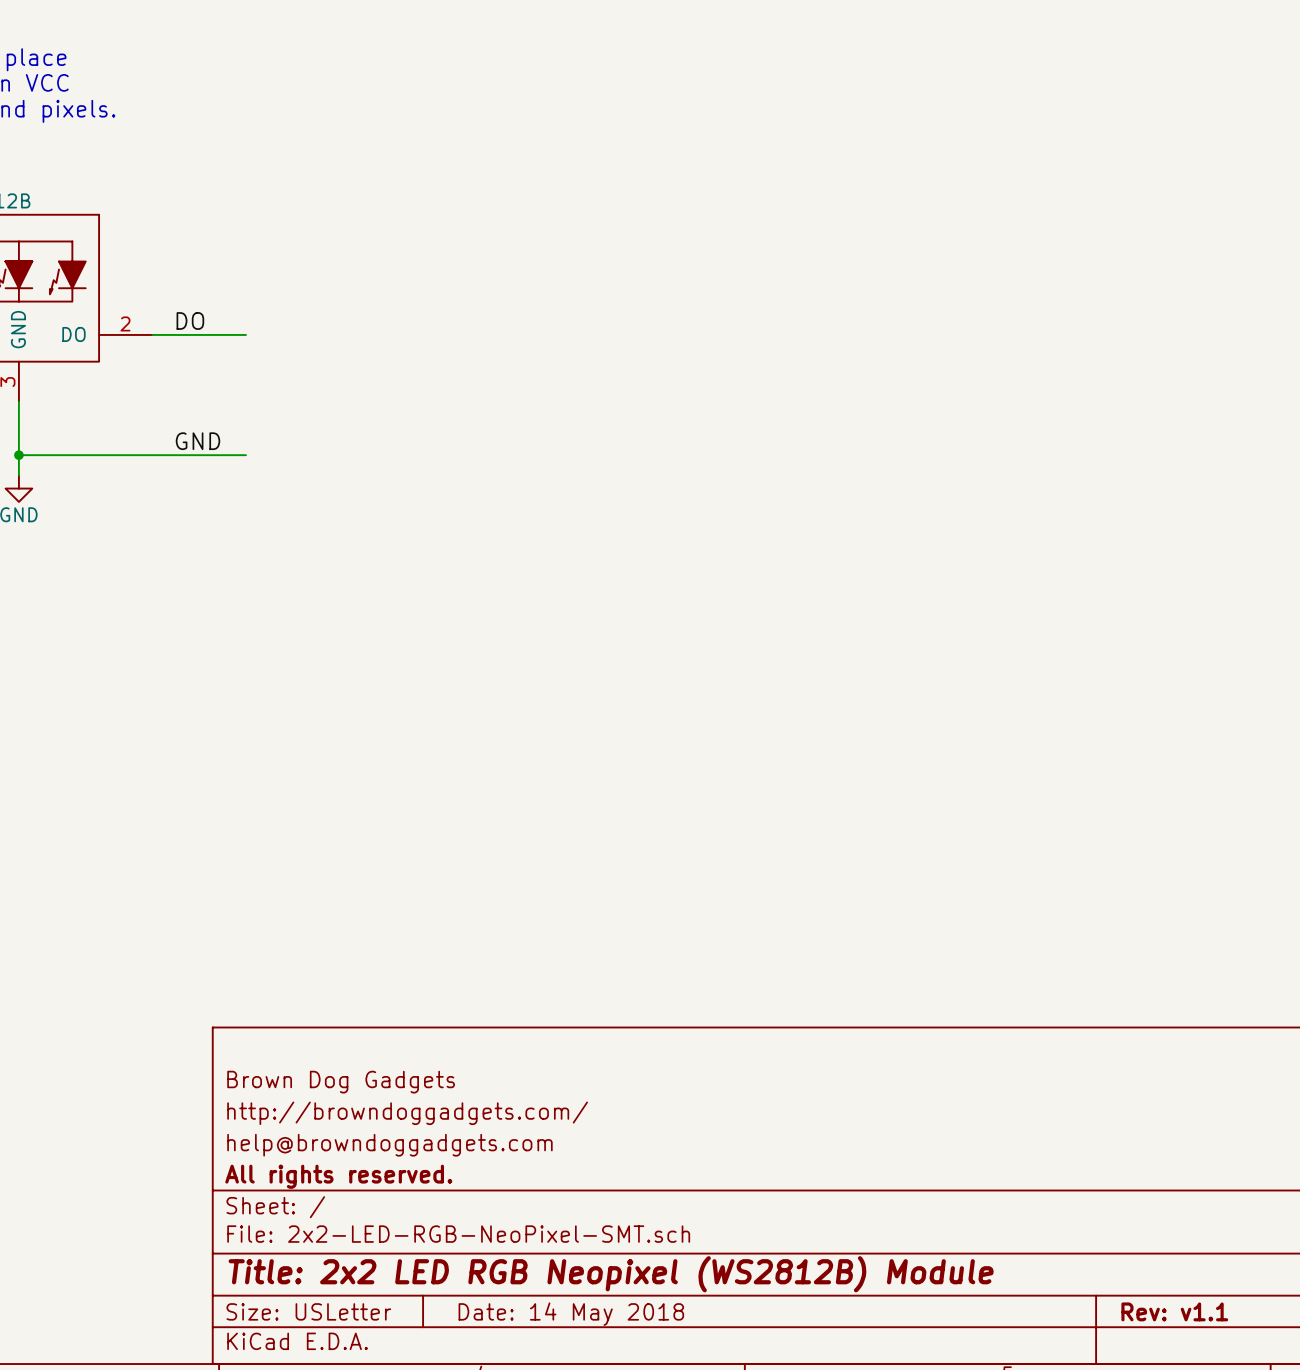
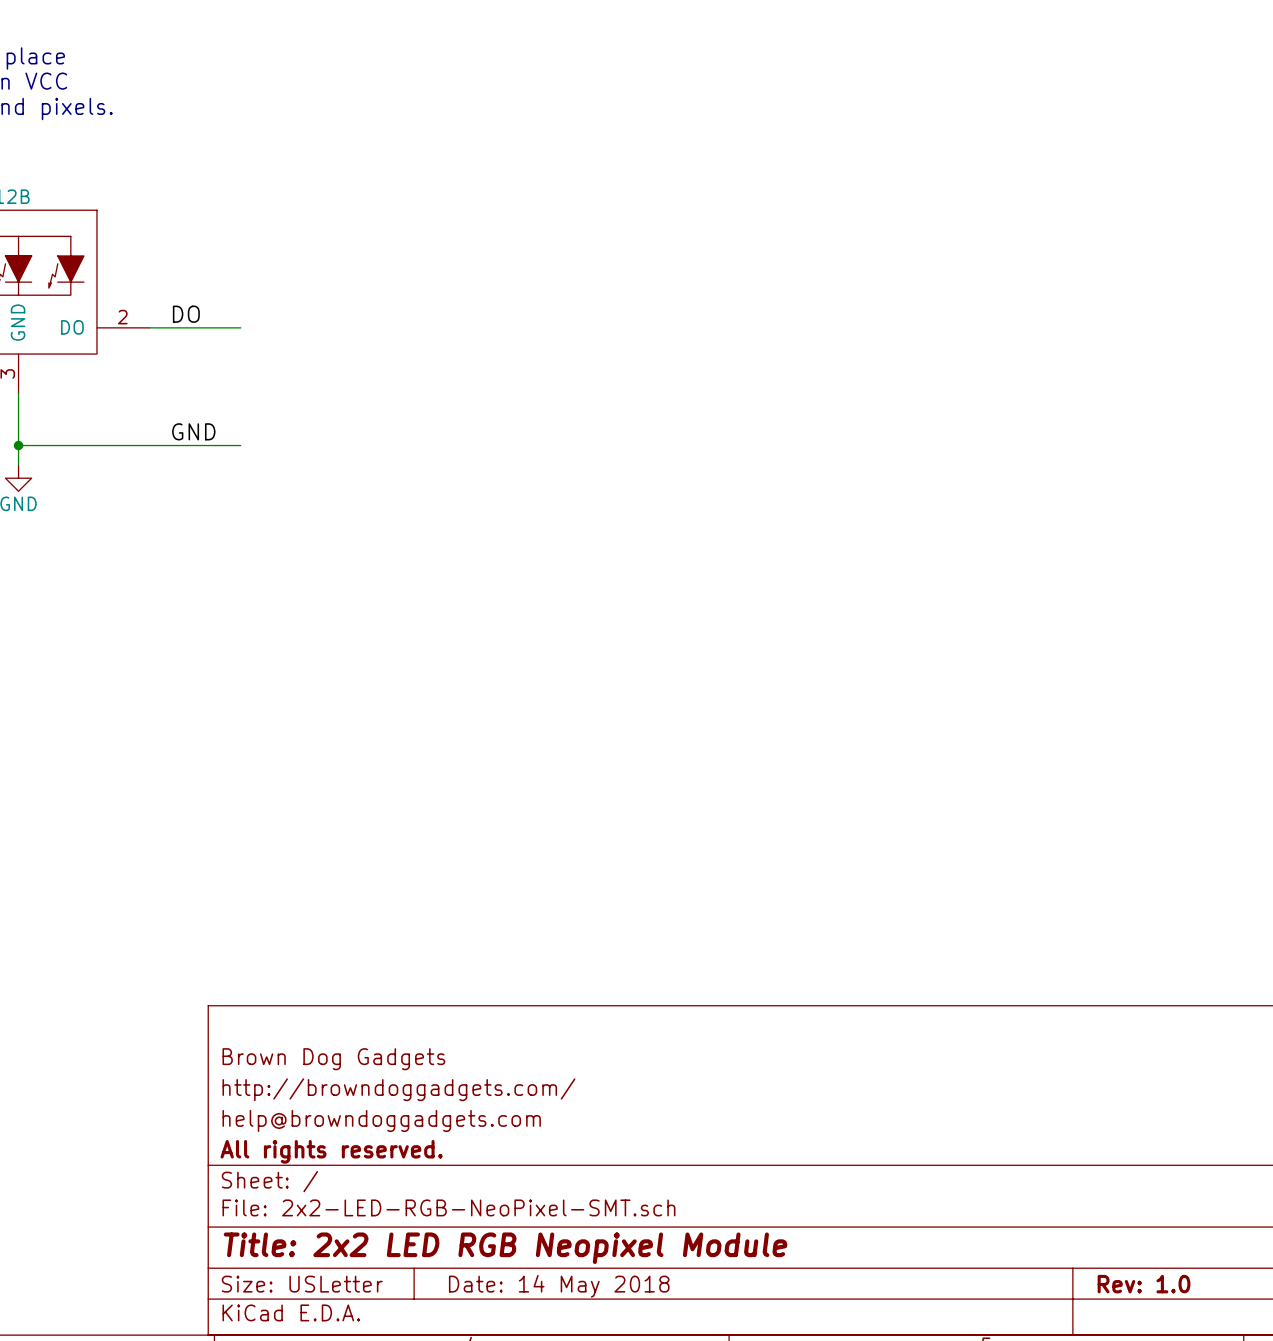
title block: Title: 2x2 LED RGB Neopixel (WS2812B) Module (611, 1274) -> Title: 2x2 LED RGB Neopixel Module (505, 1248)
title block: Rev: v1.1 (1174, 1311) -> Rev: 1.0 (1144, 1284)

